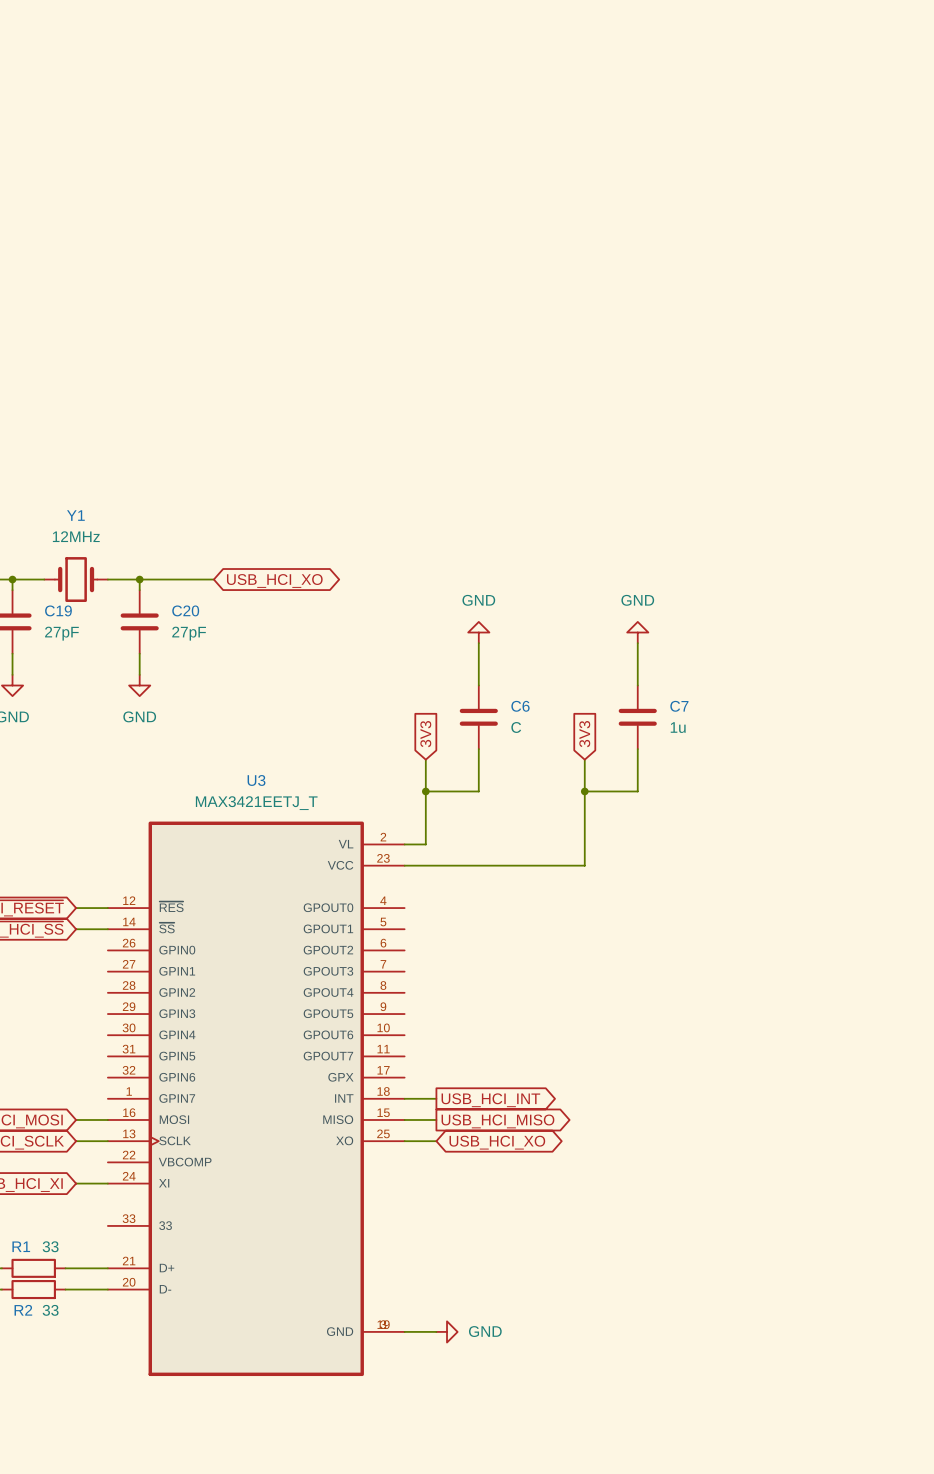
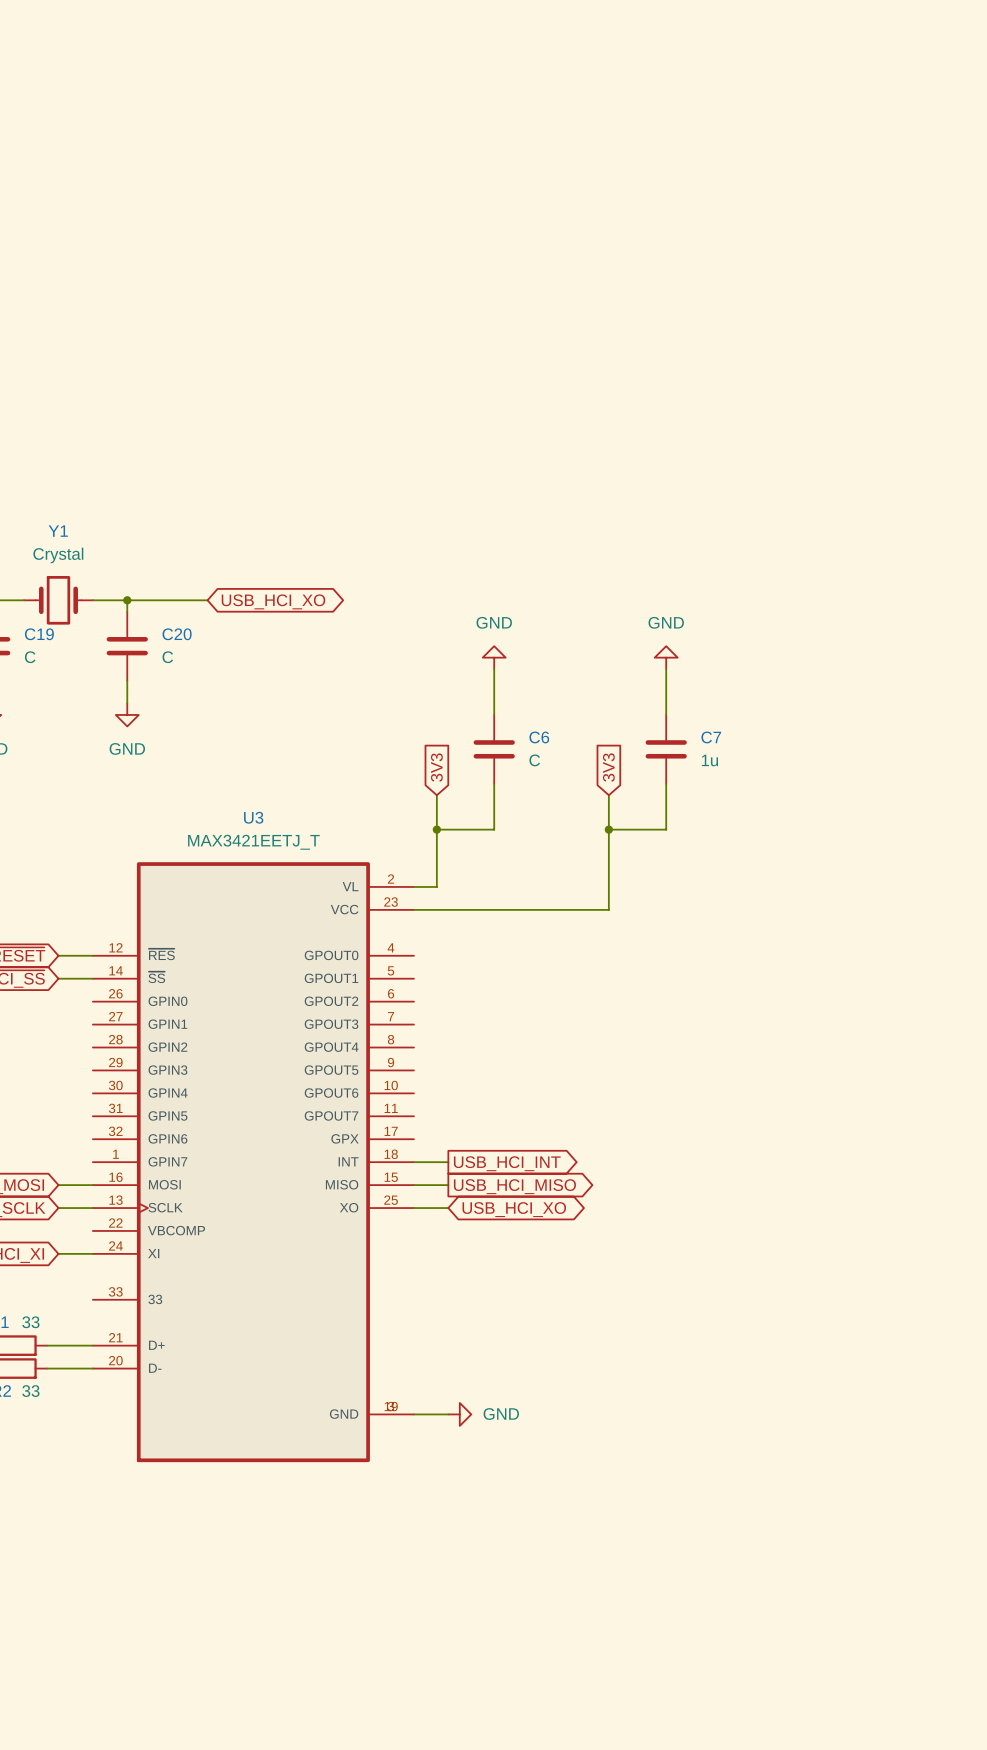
Y1 value: 12MHz (76, 536) -> Crystal (58, 555)
C19 value: 27pF (61, 633) -> C (30, 657)
C20 value: 27pF (189, 633) -> C (167, 657)

